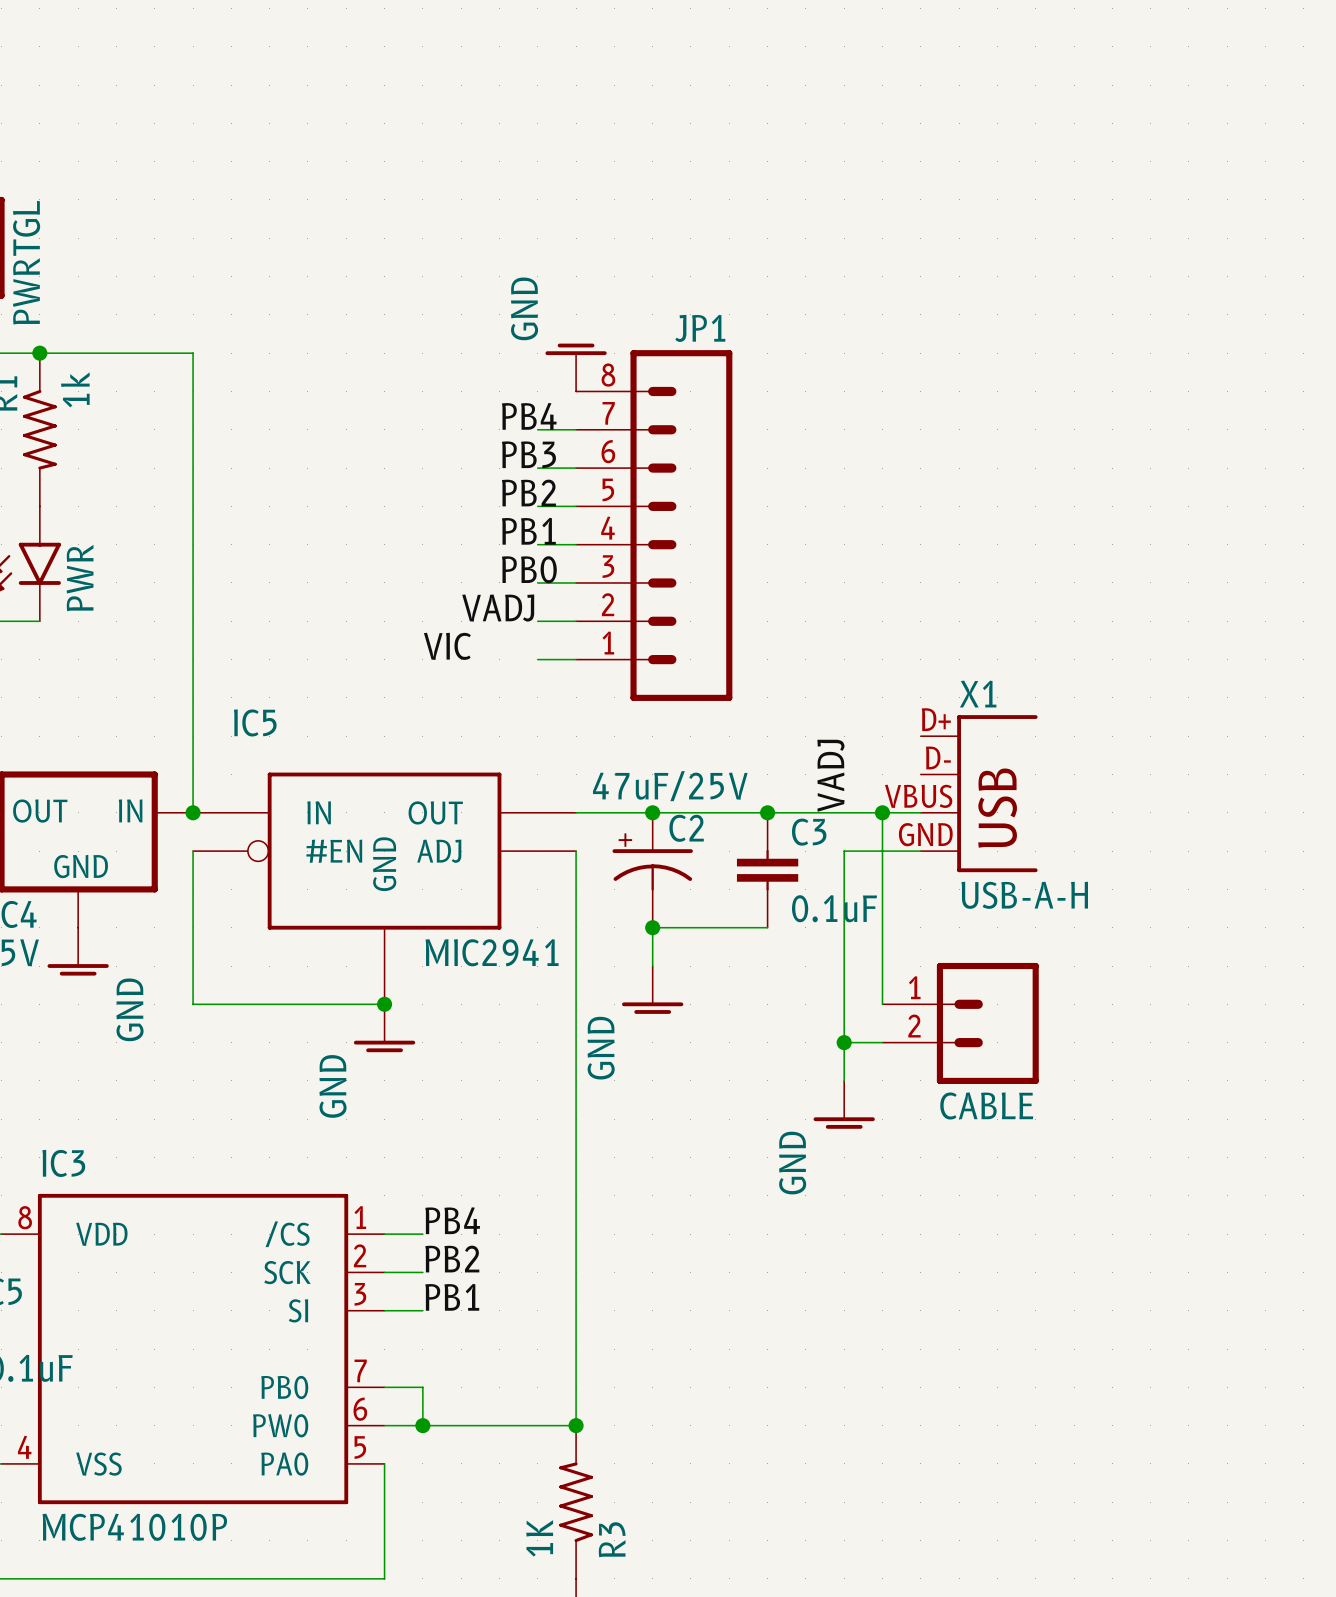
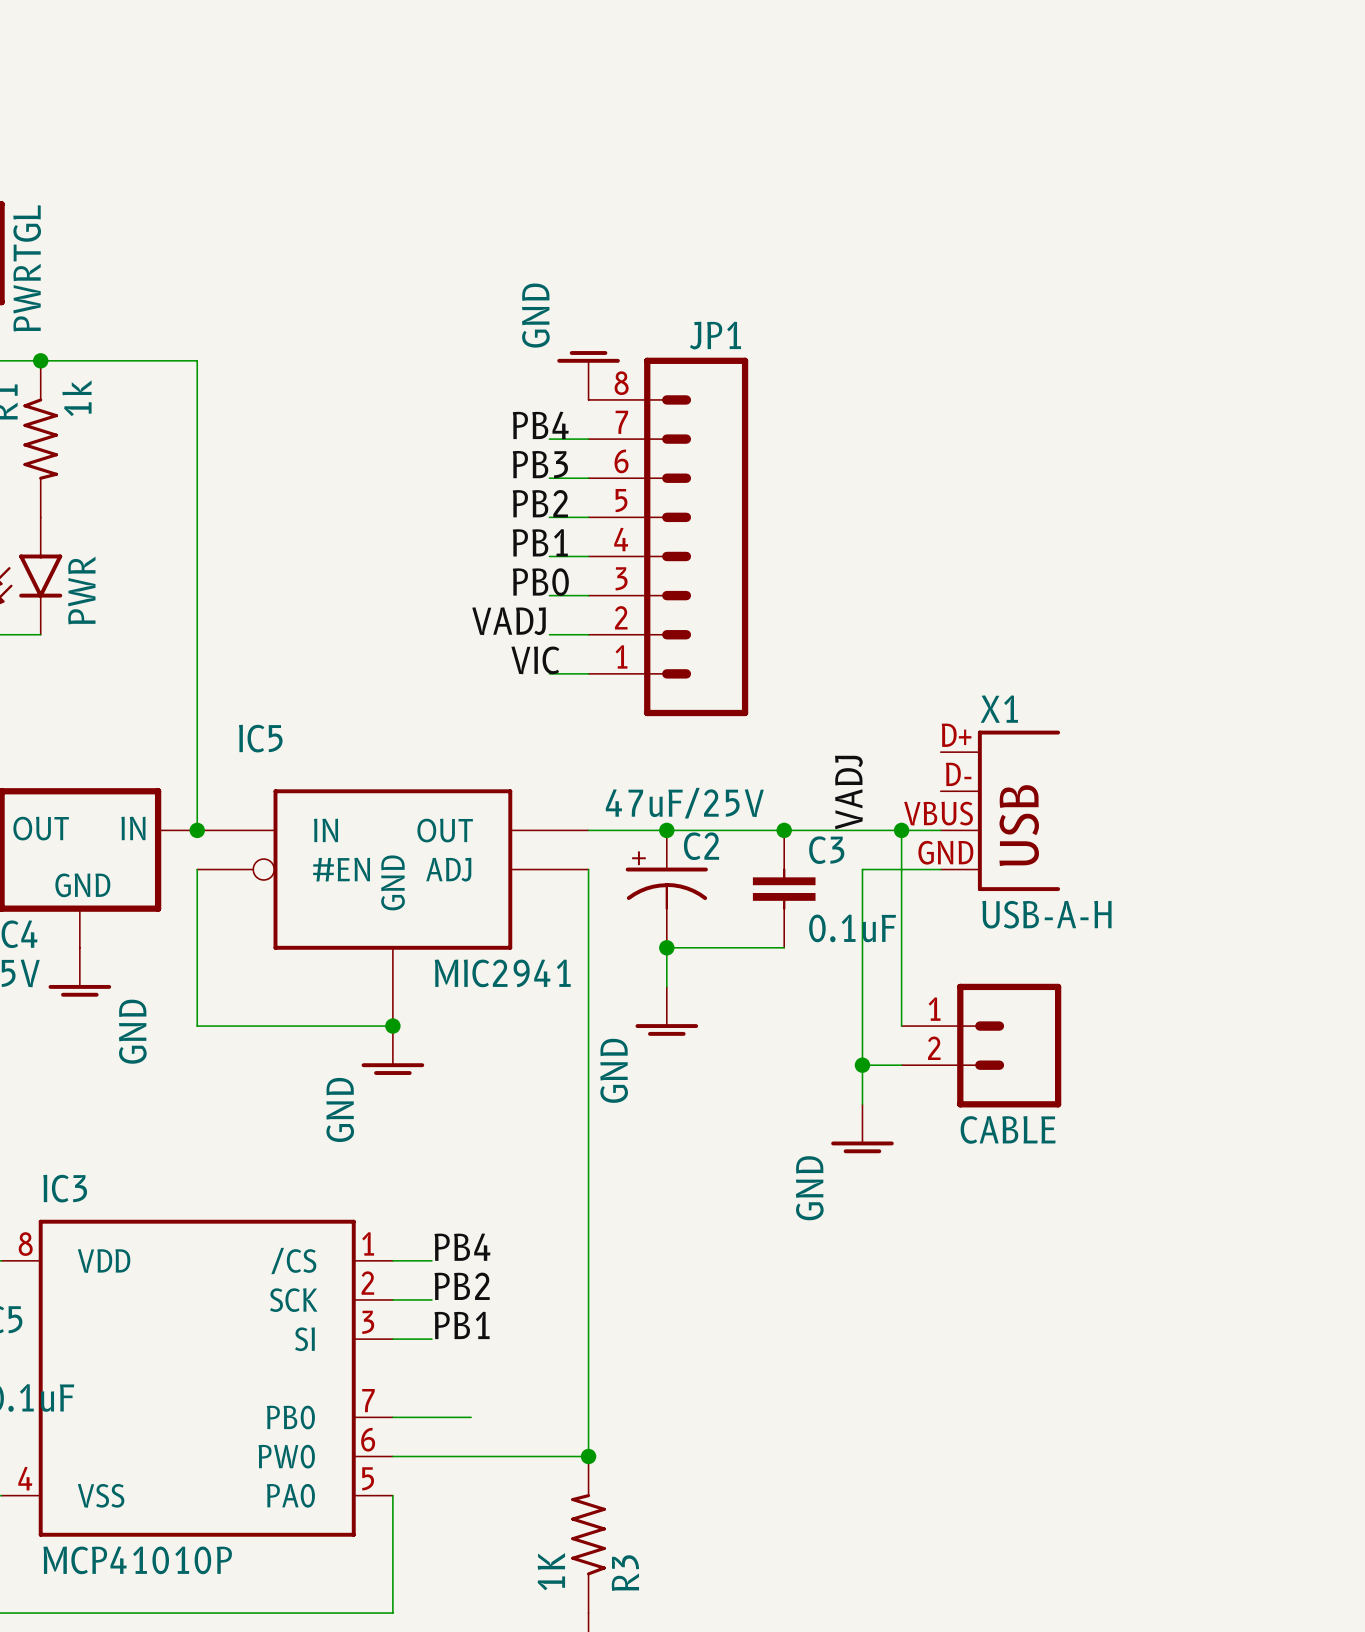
label position: VIC (447, 646) -> VIC (535, 660)
wire: (422, 1387) (422, 1425) -> (432, 1417) (471, 1417)
junction: (422, 1425) -> none

